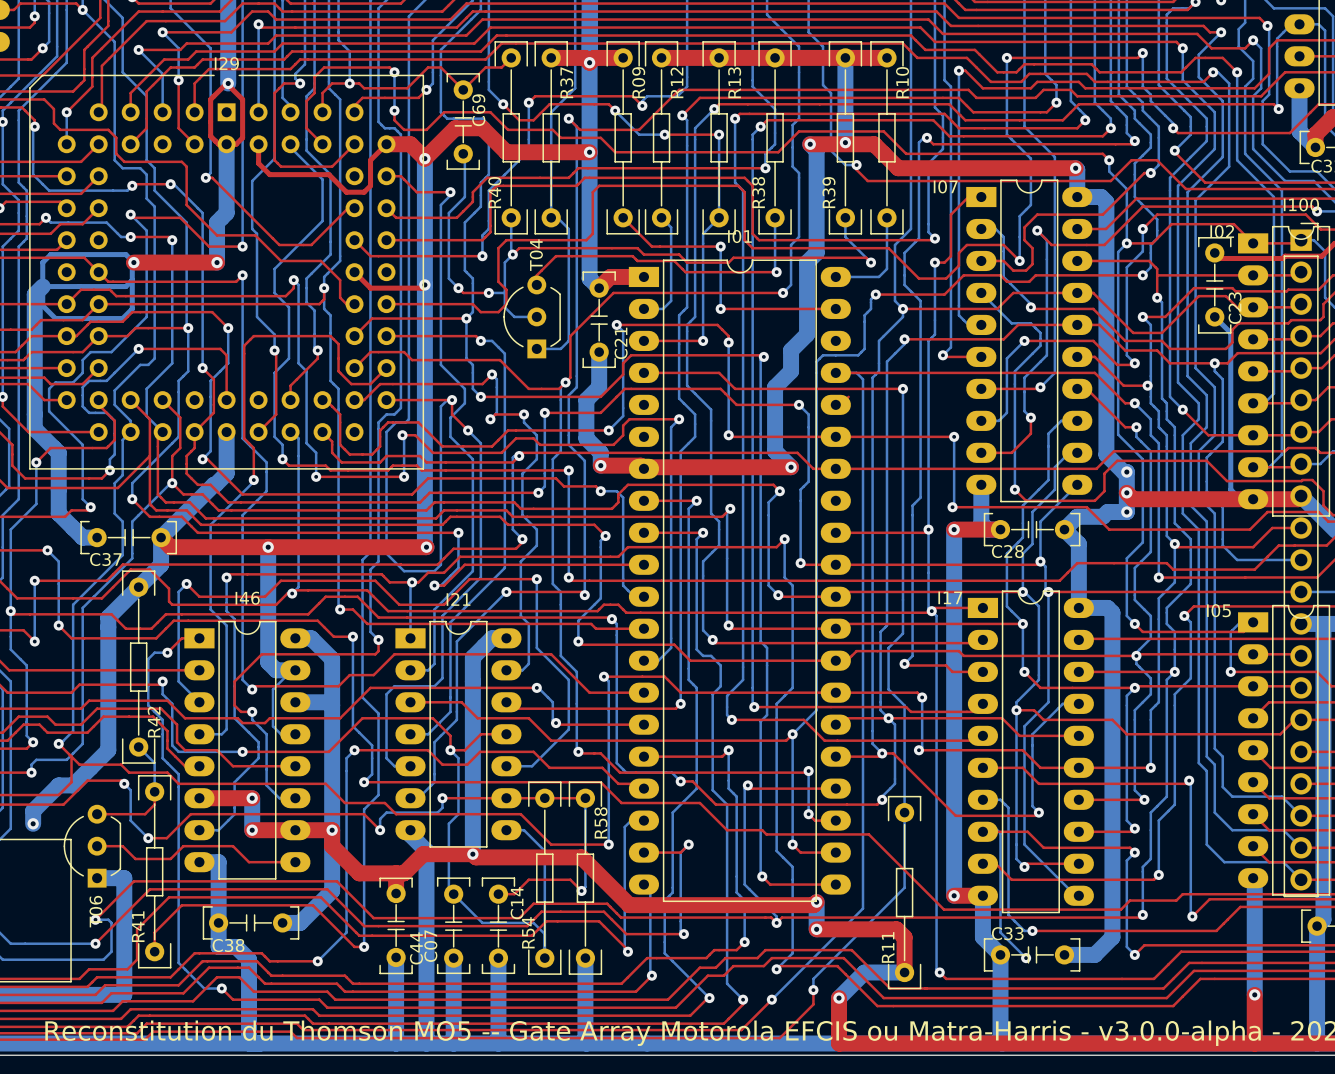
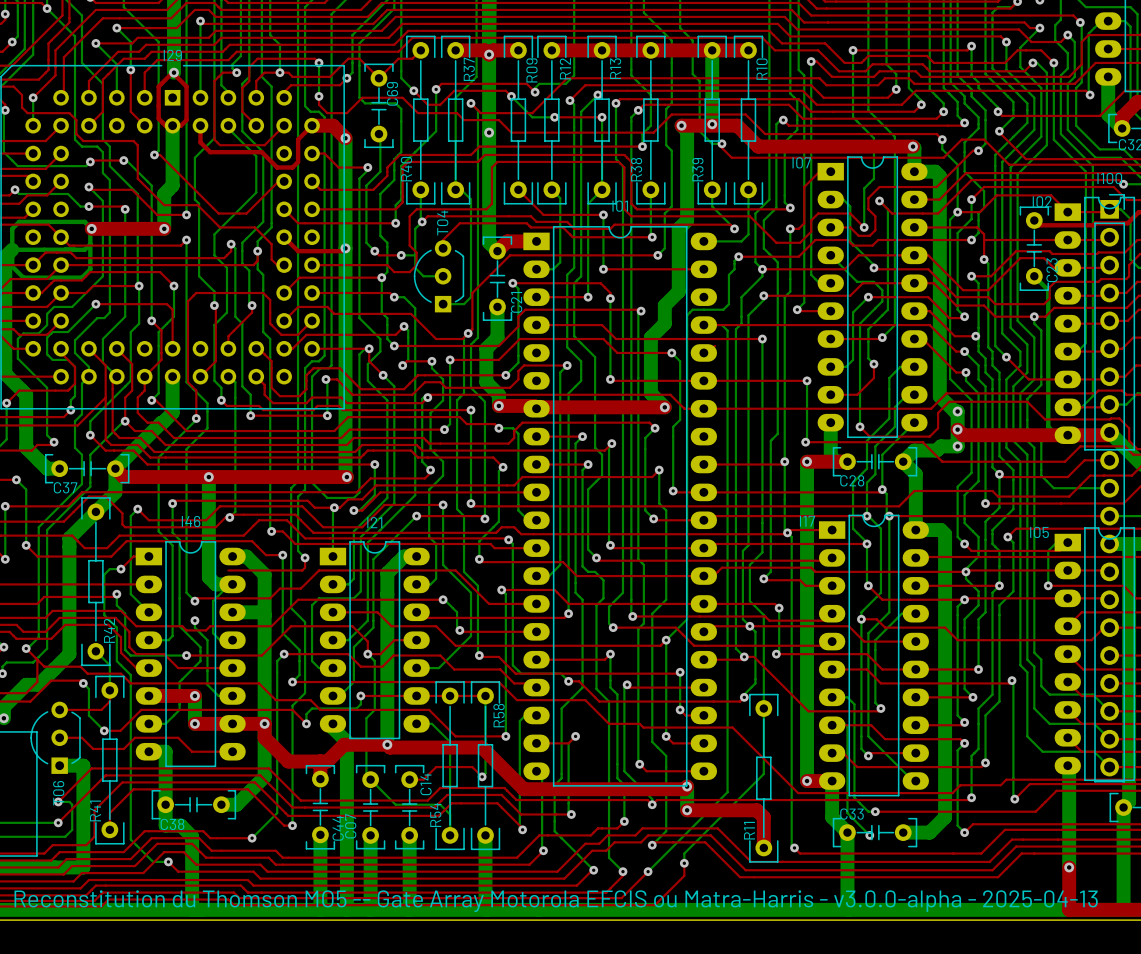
top track: (589, 152) (506, 152) (482, 128) (455, 128) (424, 158) -> none
top track: (290, 654) (261, 654) (234, 681) (234, 705) (241, 711) (252, 711) -> none
bottom track: (904, 972) (864, 972) (839, 998) -> none
top track: (839, 998) (839, 1043) (1254, 1043) -> none
via: (839, 998) -> none

